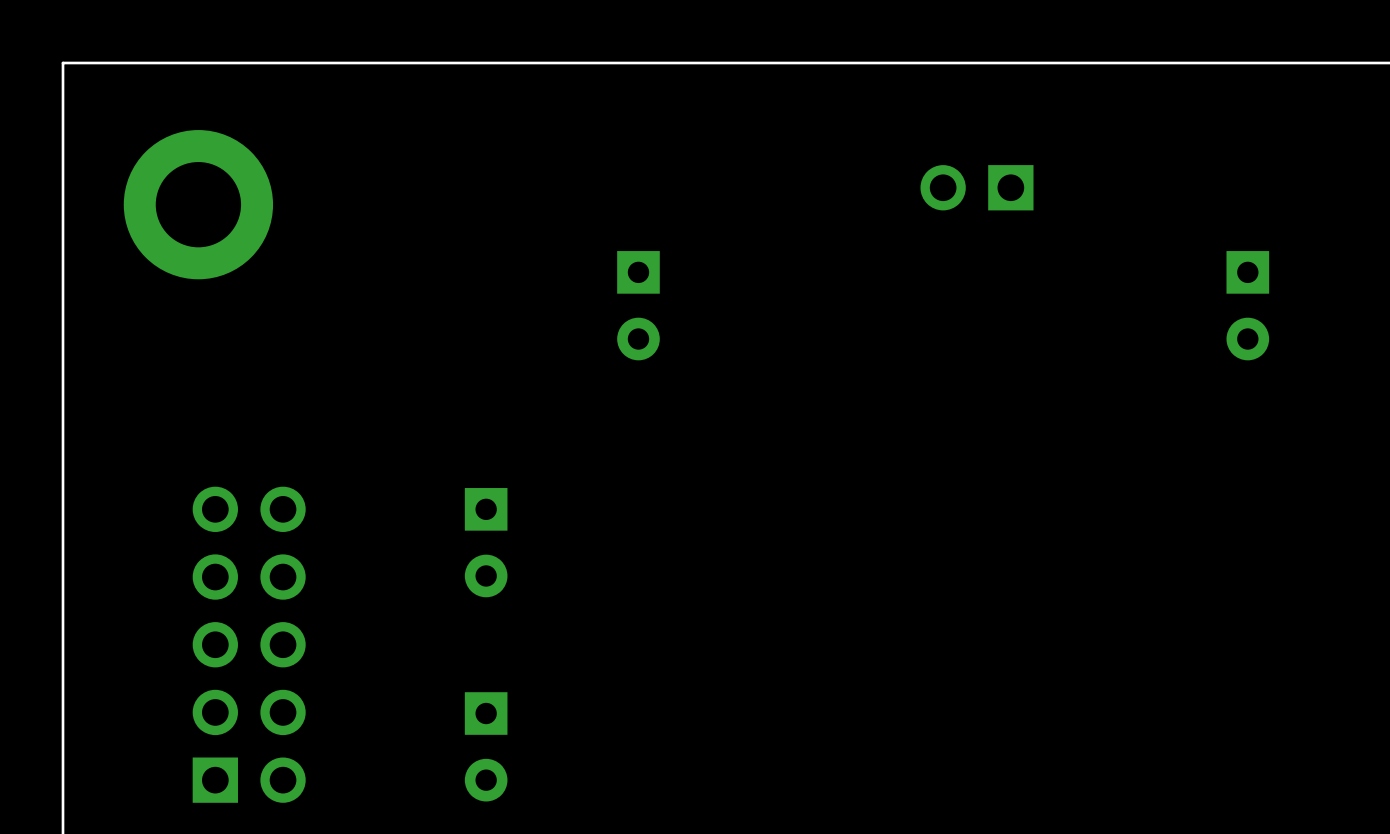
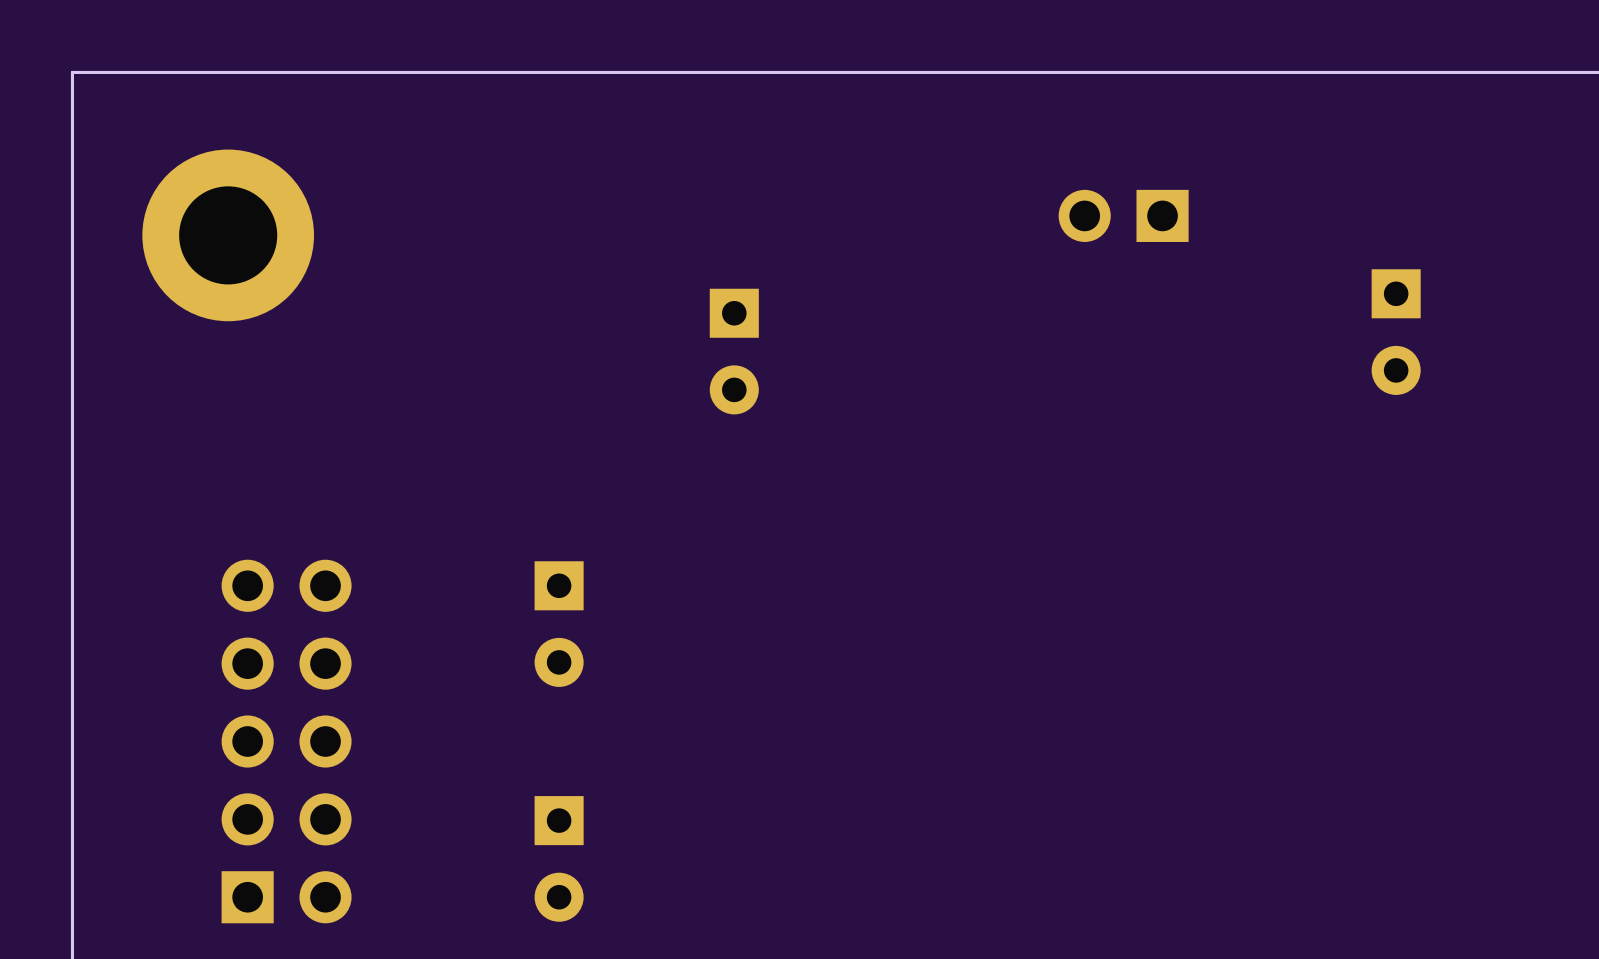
part position: (1247, 305) -> (1396, 332)

